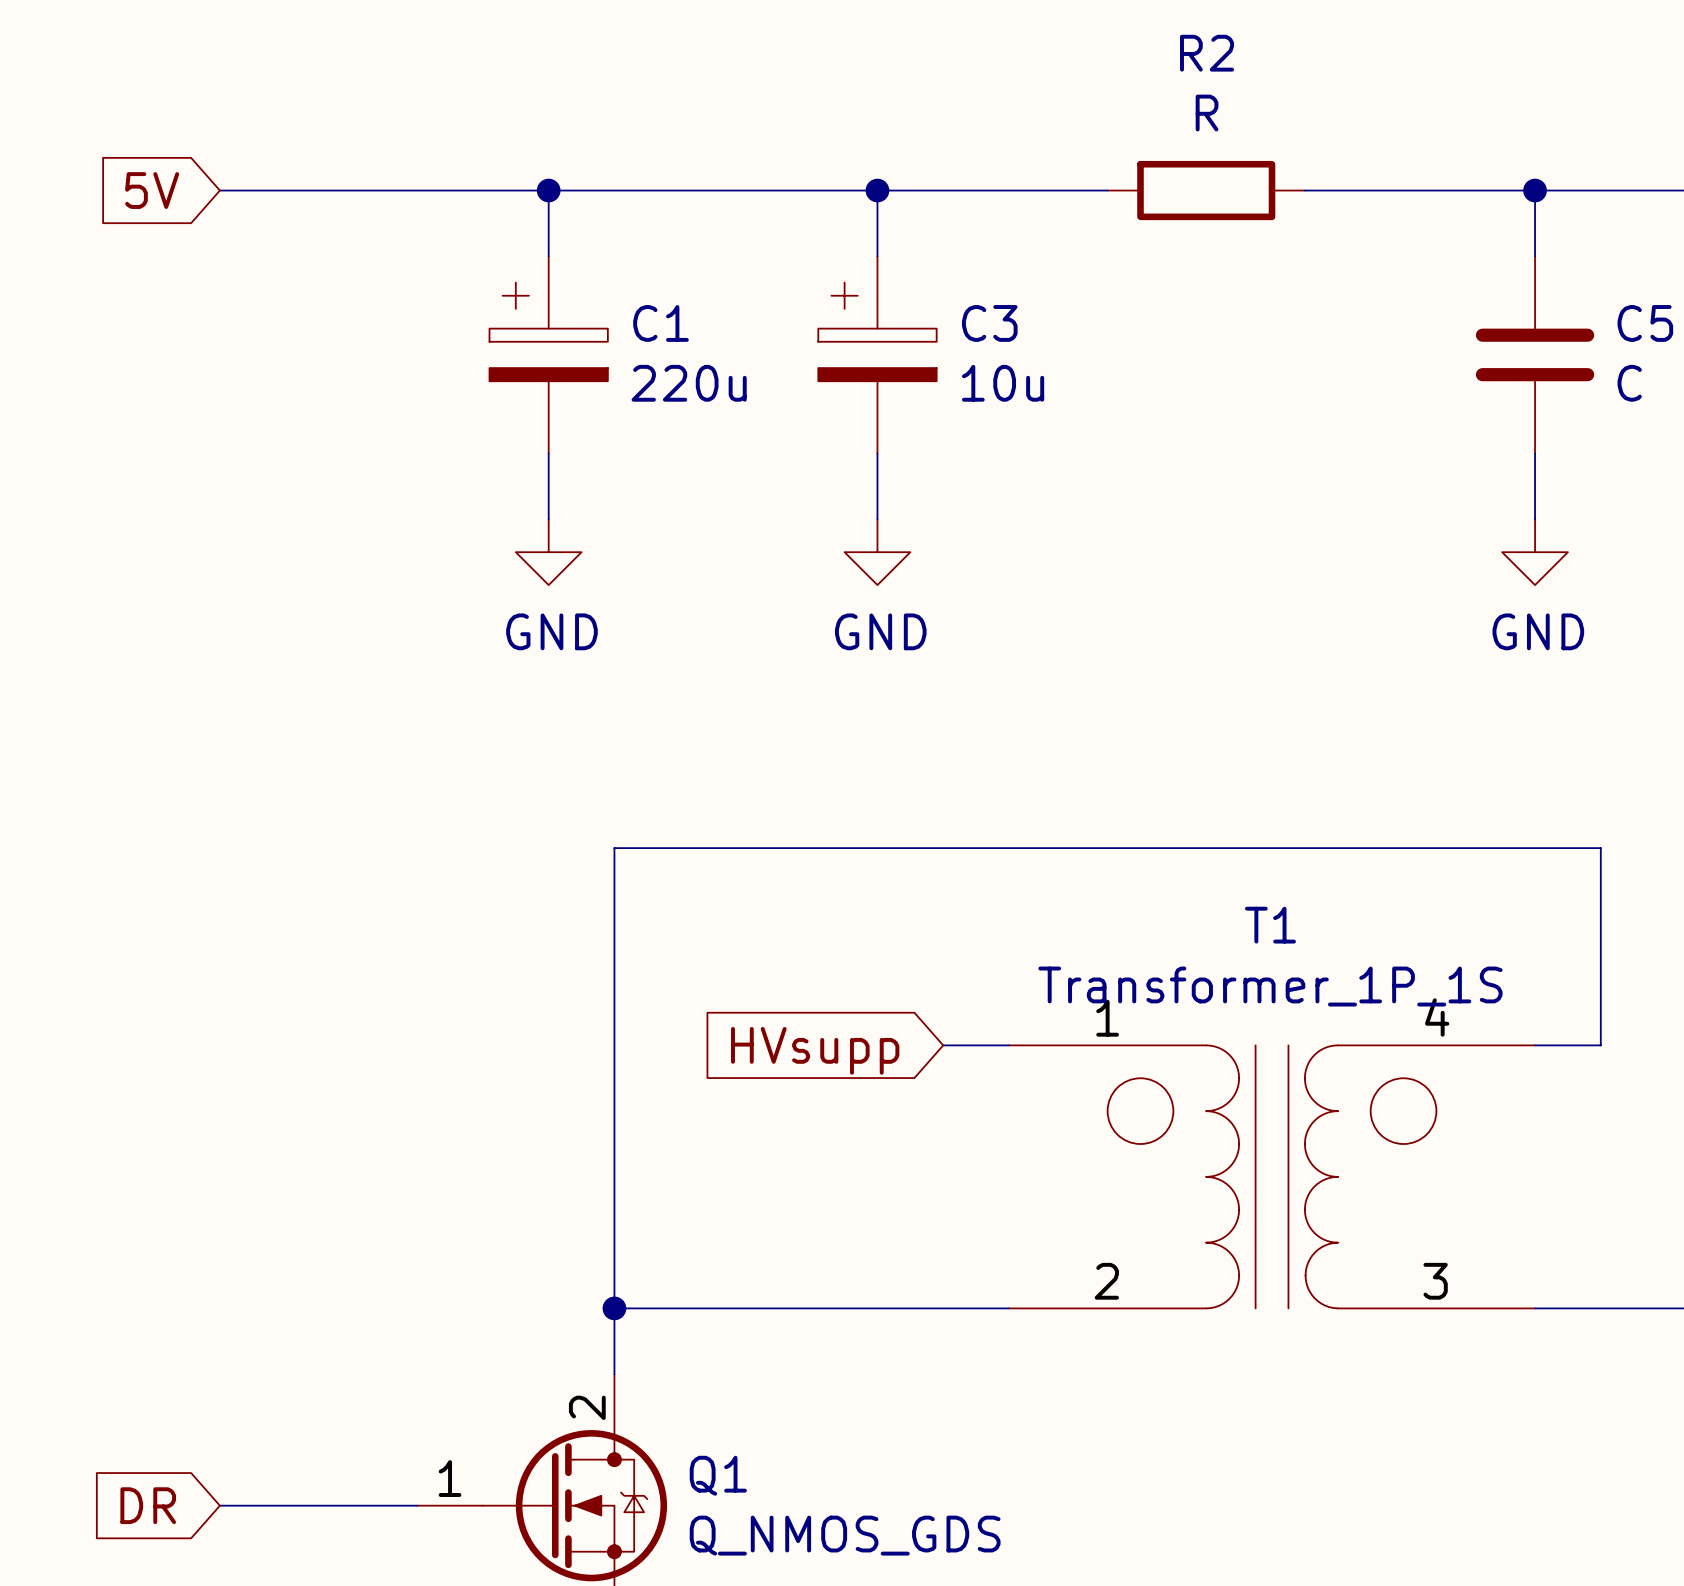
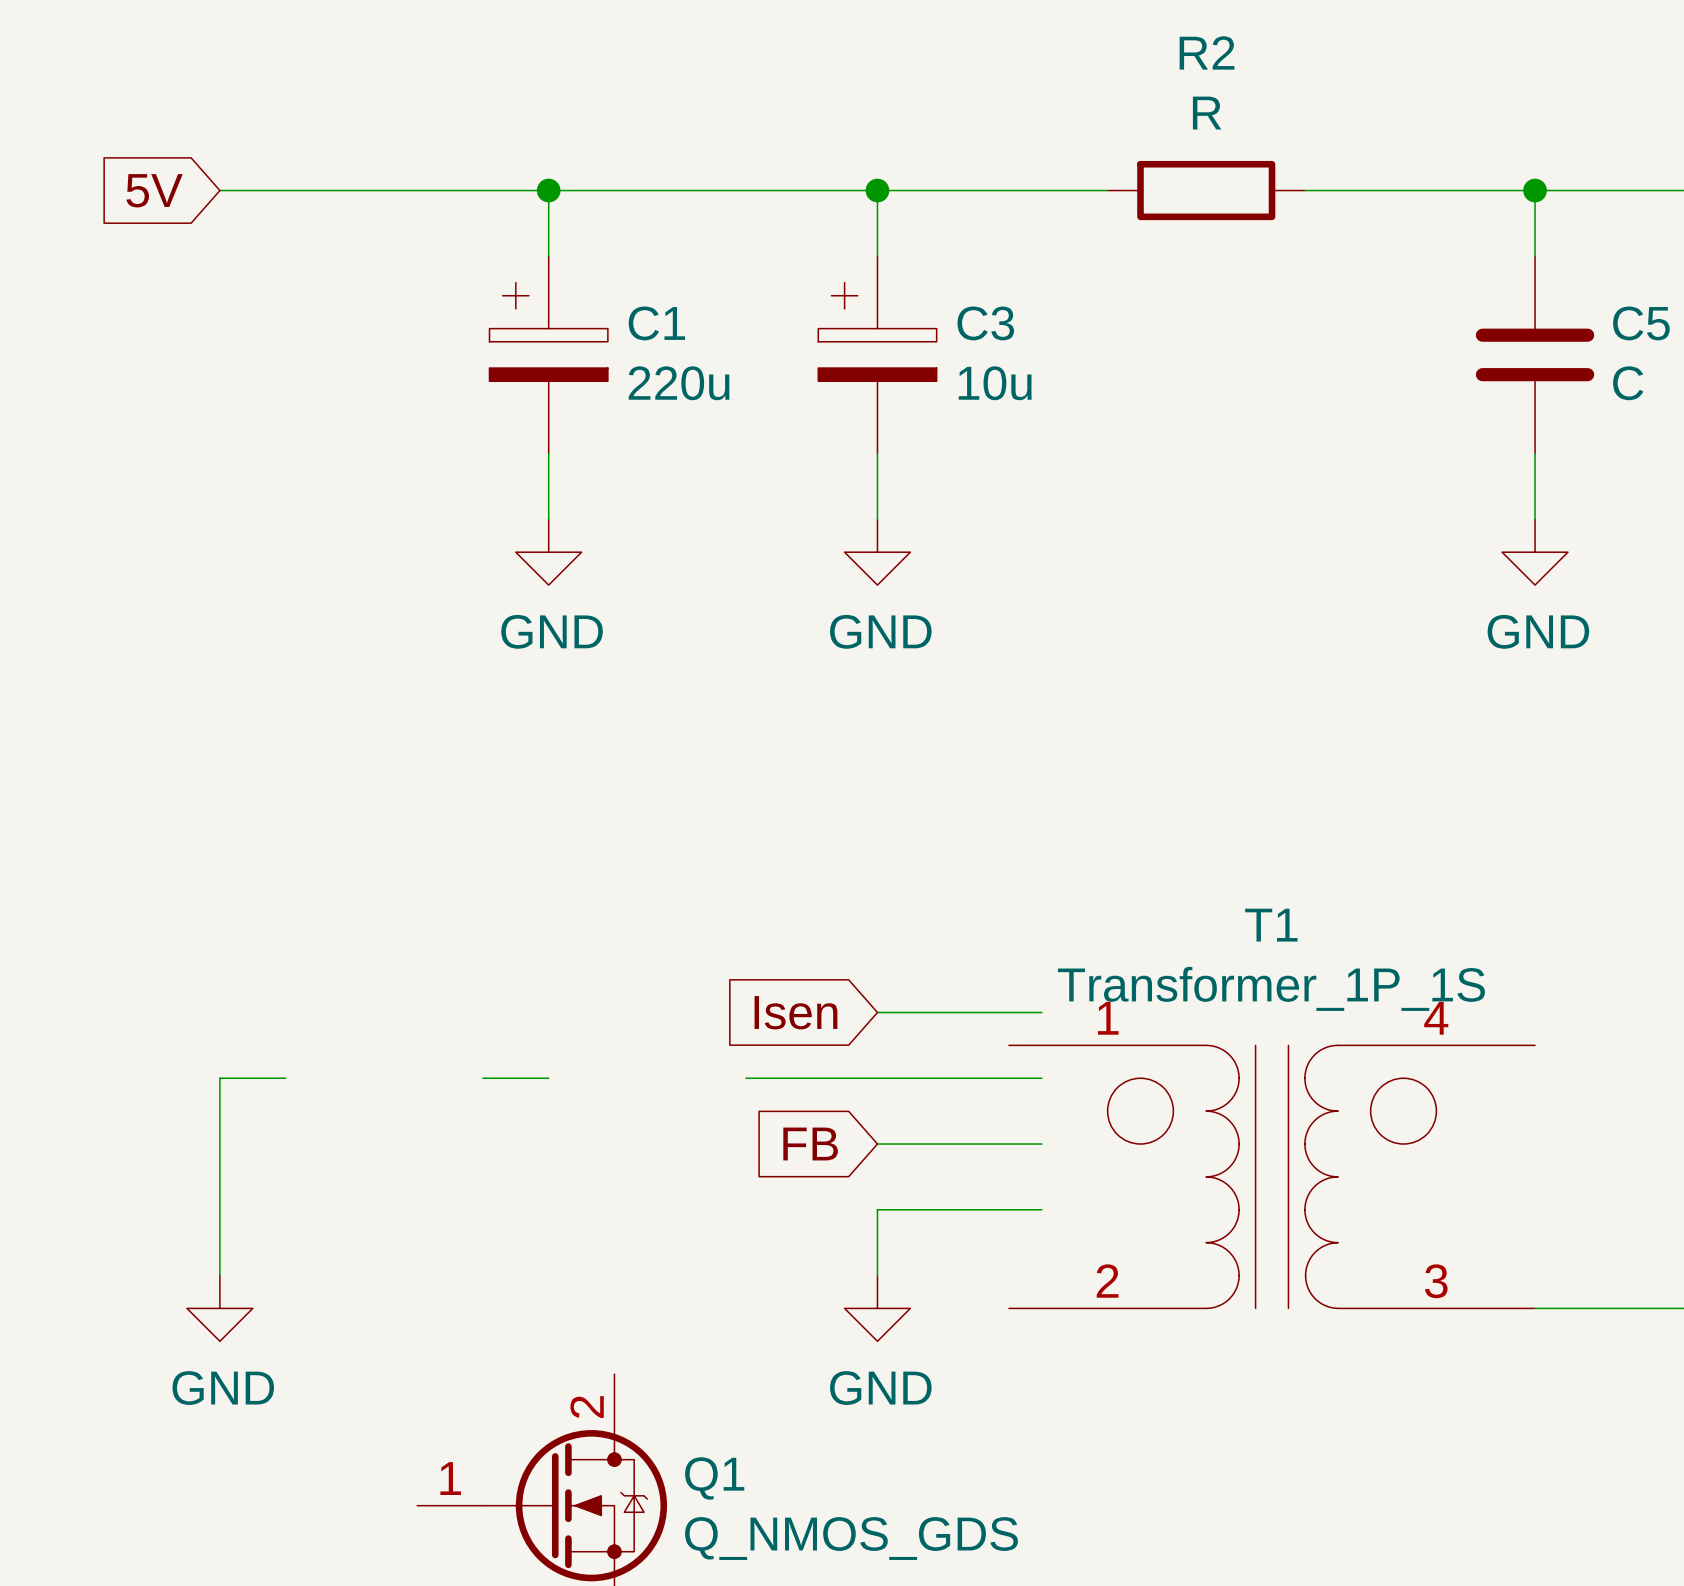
global label: none -> Isen (795, 1012)
wire: none -> (877, 1012) (1041, 1012)
wire: (943, 1045) (1008, 1045) -> (482, 1078) (548, 1078)
wire: (1535, 1045) (1600, 1045) (1600, 848) (614, 848) (614, 1374) -> none
global label: HVsupp (815, 1050) -> none
wire: none -> (285, 1078) (219, 1078) (219, 1275)
wire: none -> (745, 1078) (1041, 1078)
global label: none -> FB (810, 1144)
wire: none -> (877, 1144) (1041, 1144)
wire: none -> (1041, 1209) (877, 1209) (877, 1275)
power symbol: none -> GND (219, 1308)
wire: (614, 1308) (1008, 1308) -> none
junction: (614, 1308) -> none
power symbol: none -> GND (877, 1308)
global label: DR (148, 1505) -> none
wire: (219, 1505) (417, 1505) -> none

